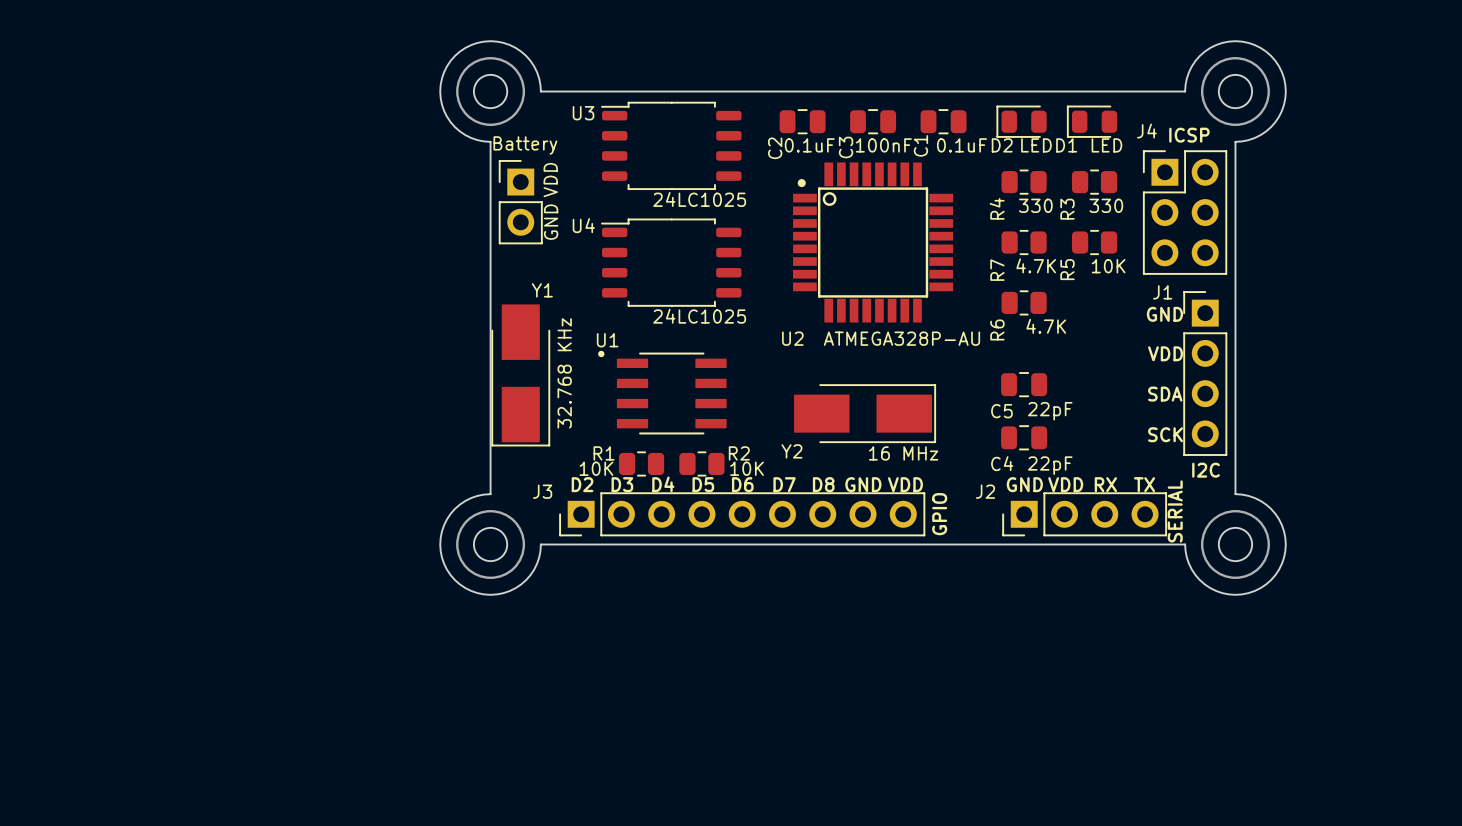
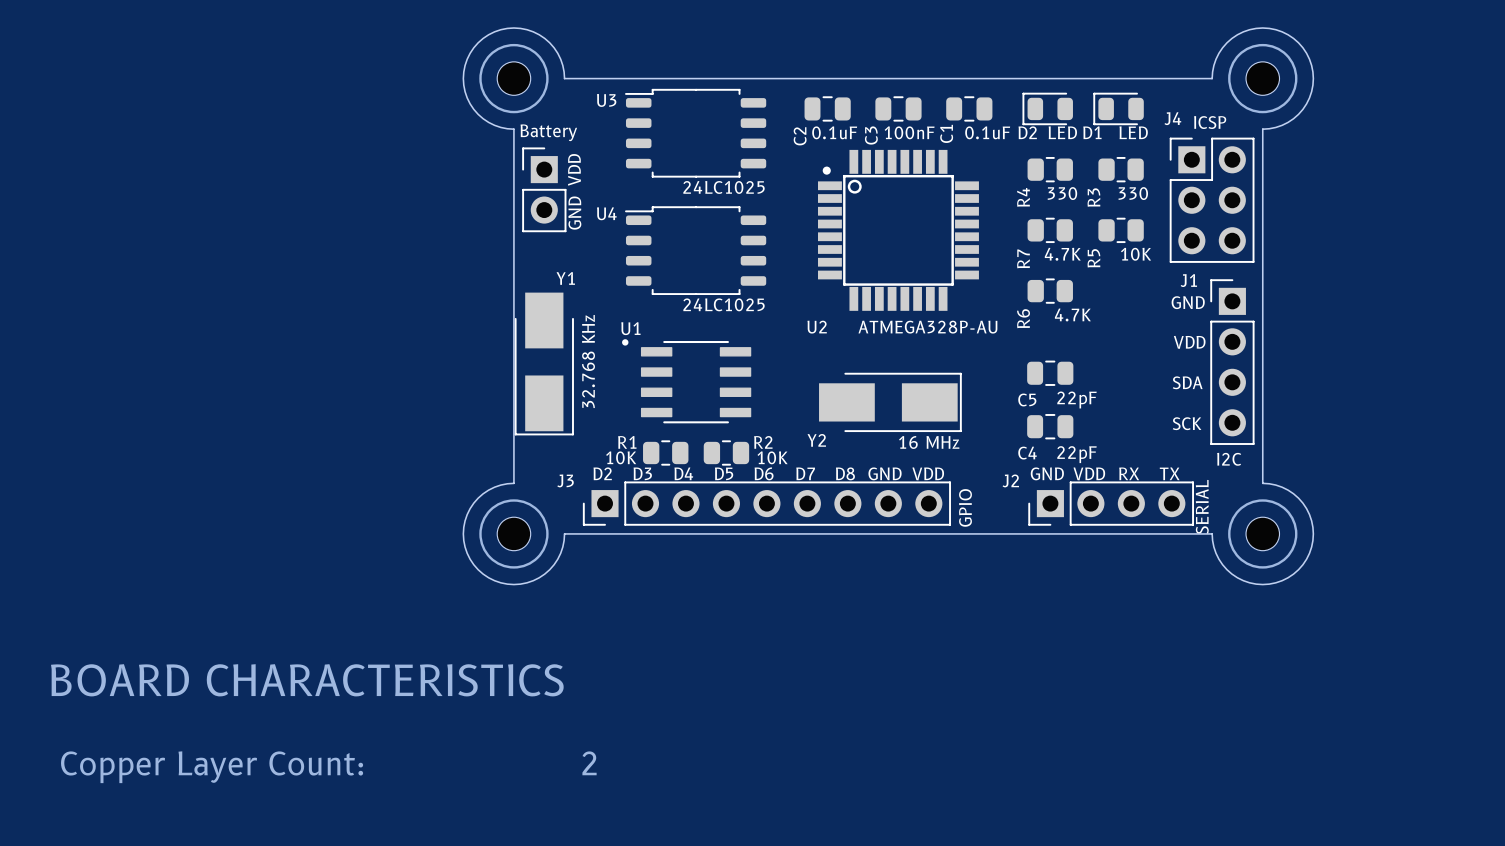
text: none -> BOARD CHARACTERISTICS (307, 680)
text: none -> 2 (589, 763)
text: none -> Copper Layer Count: (212, 767)

